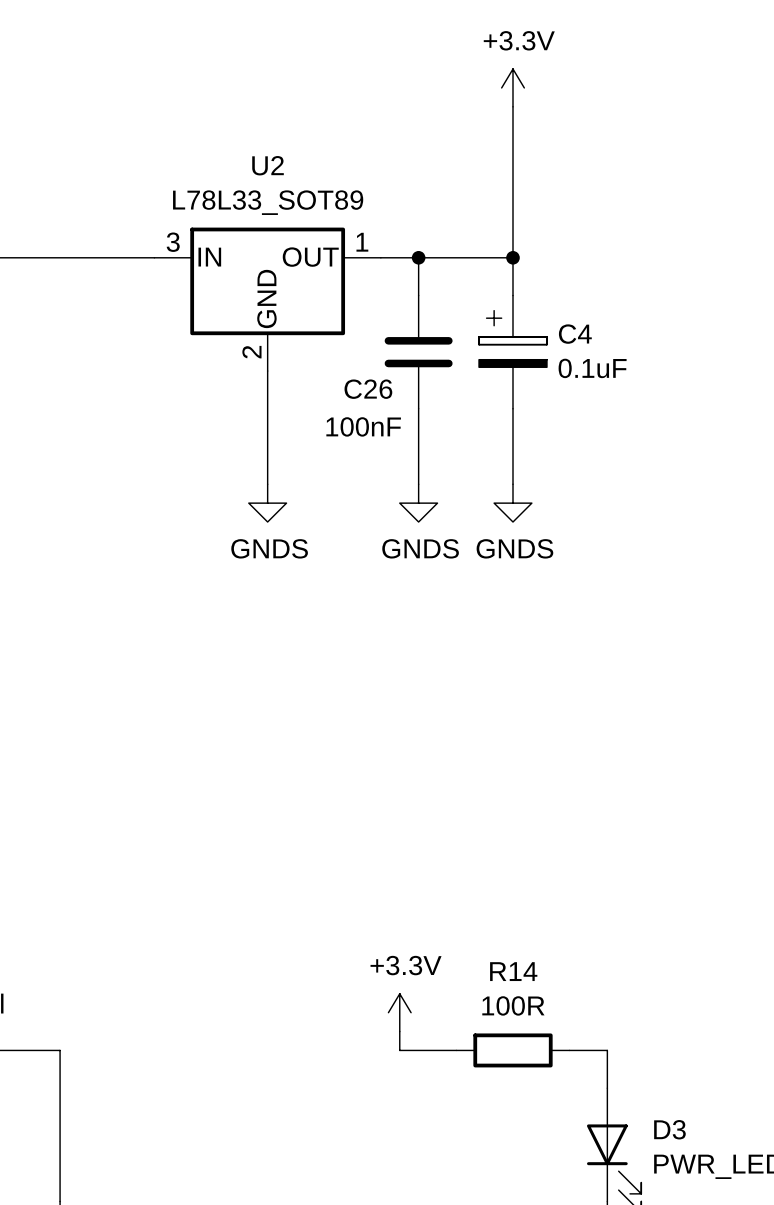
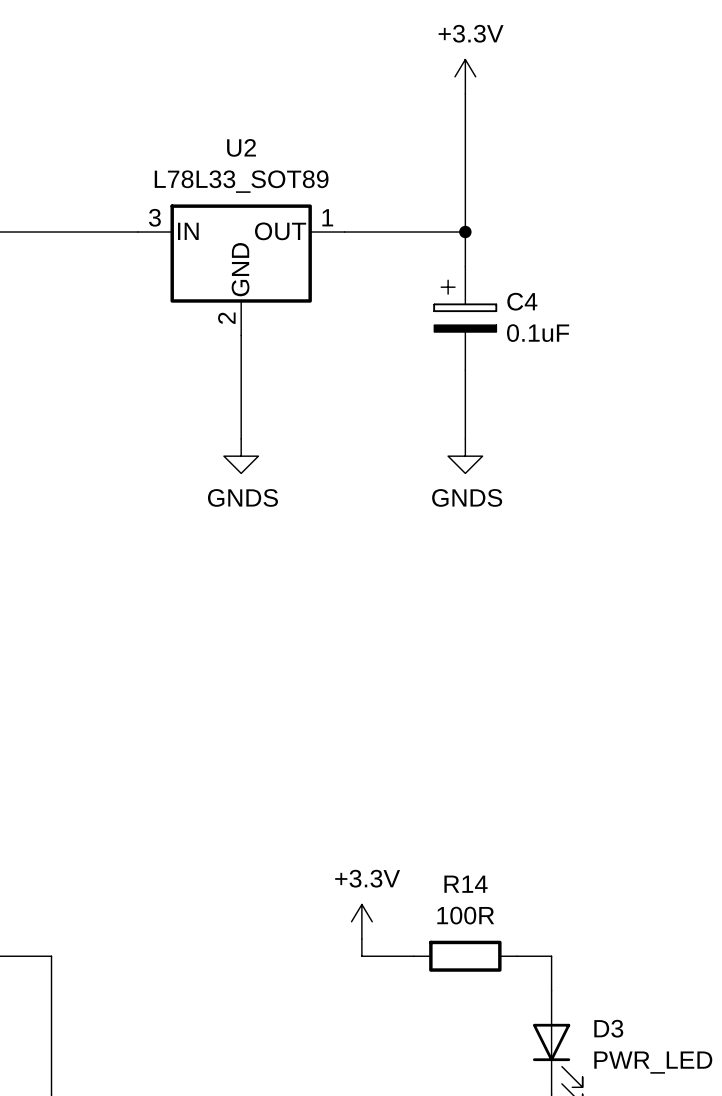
wire: (418, 257) (418, 295) -> none
junction: (418, 257) -> none
C26: 100nF (418, 352) -> none
wire: (418, 408) (418, 484) -> none
power symbol: GNDS (418, 503) -> none

